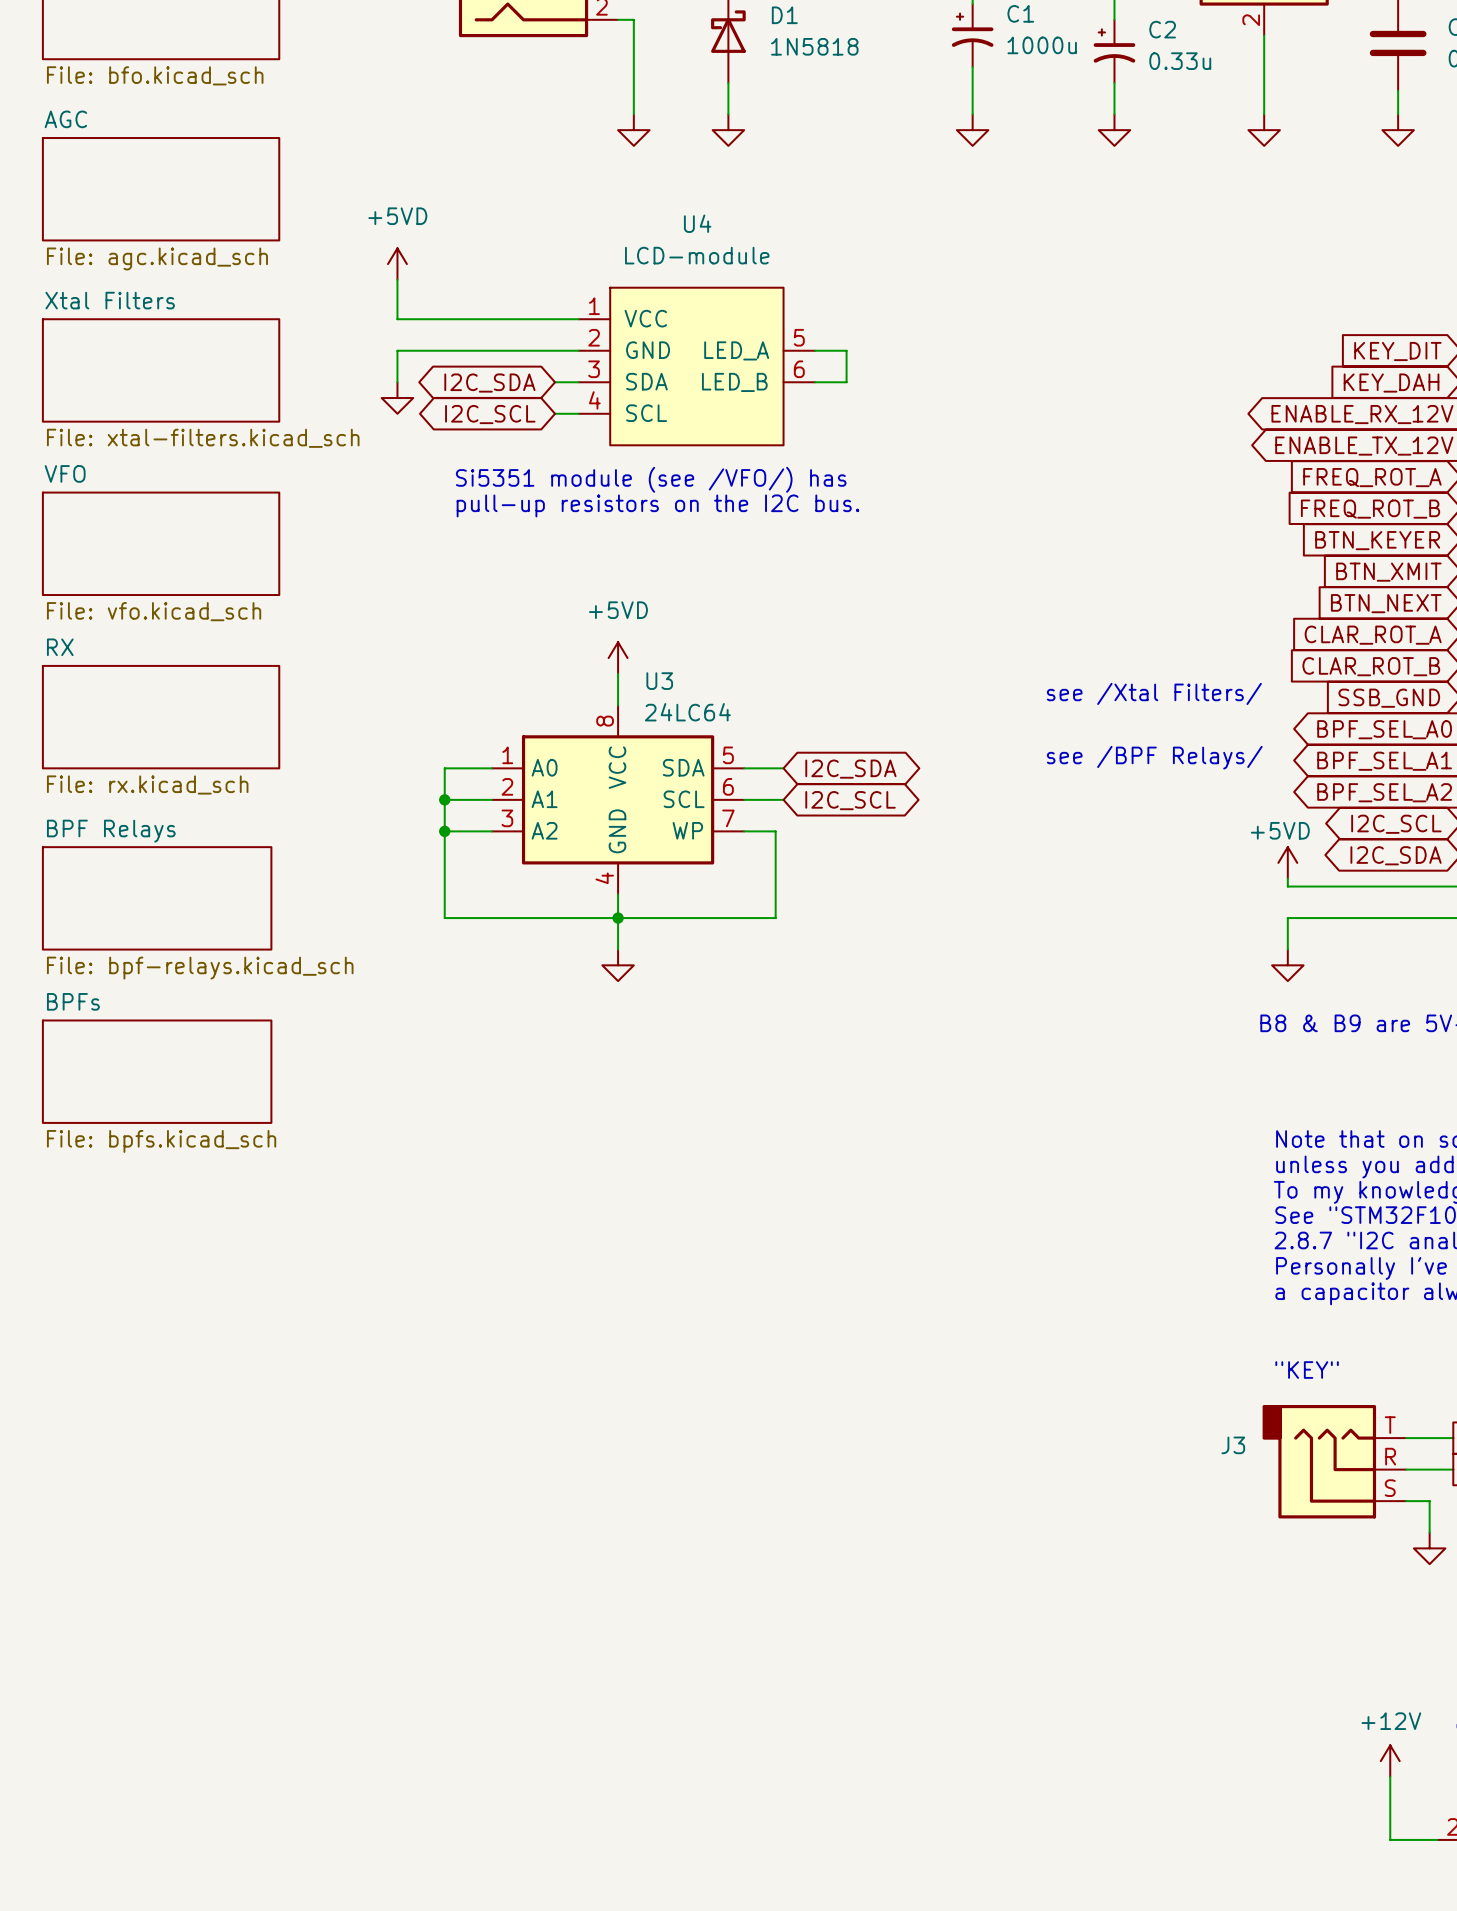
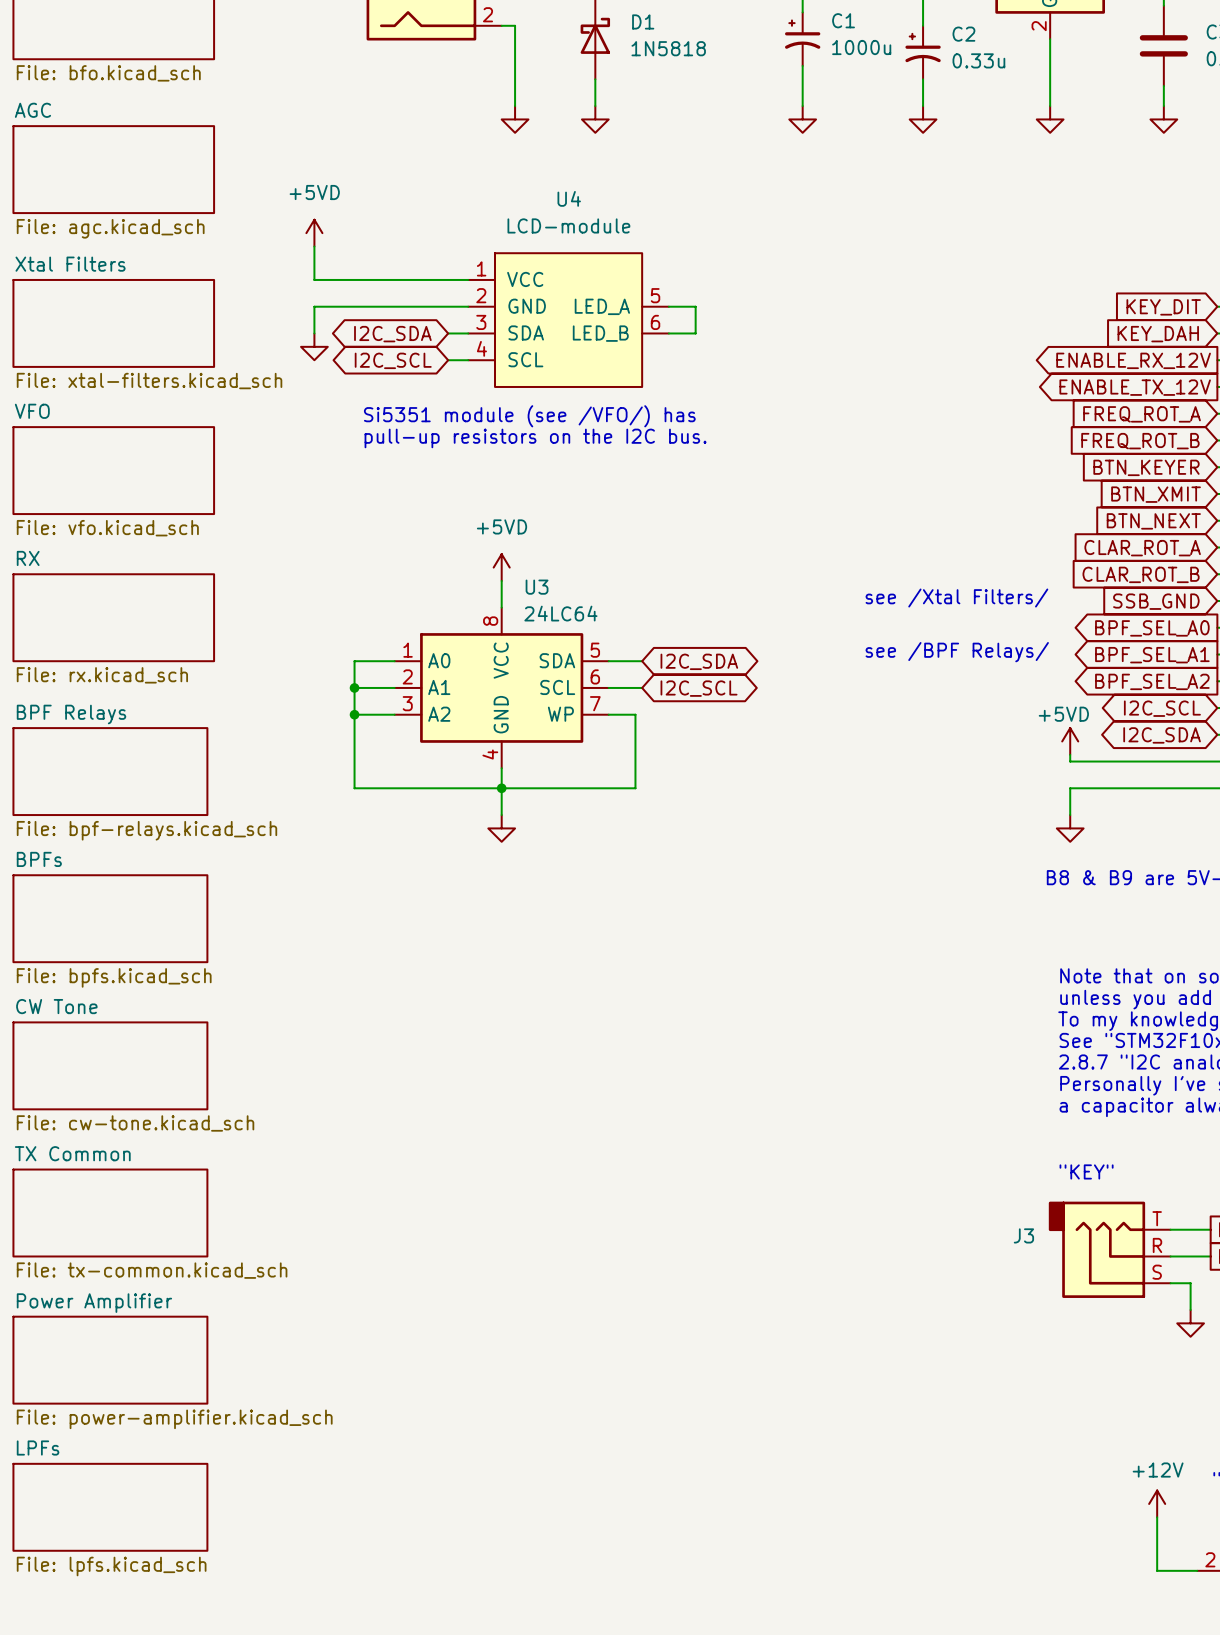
sheet CW Tone: none -> File: cw-tone.kicad_sch (110, 1065)
sheet TX Common: none -> File: tx-common.kicad_sch (110, 1213)
sheet Power Amplifier: none -> File: power-amplifier.kicad_sch (110, 1360)
sheet LPFs: none -> File: lpfs.kicad_sch (110, 1507)

